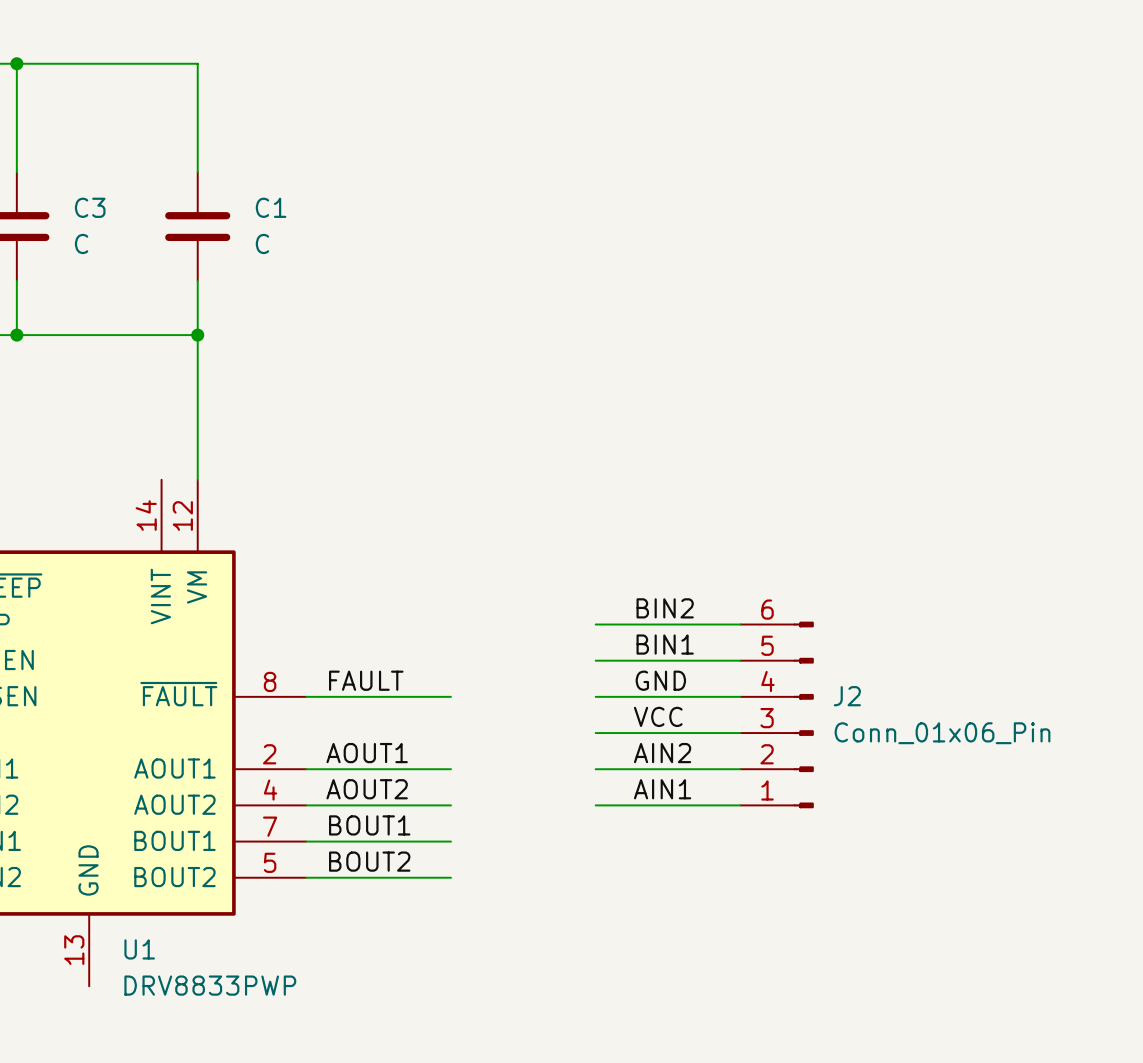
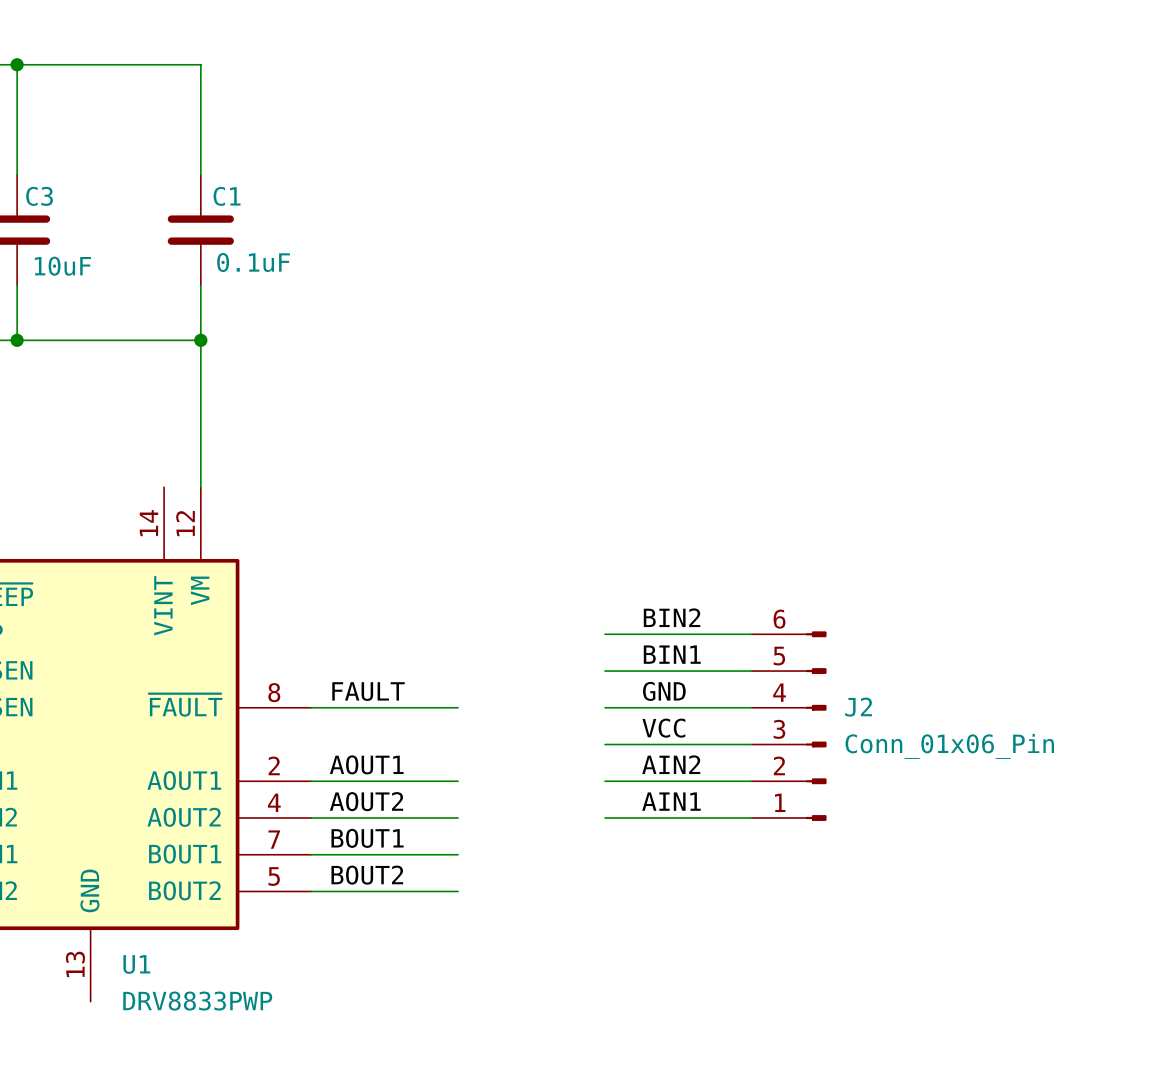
C3 name position: C3 (90, 207) -> C3 (39, 196)
C1 name position: C1 (271, 207) -> C1 (227, 196)
C3 value: C (81, 243) -> 10uF (62, 266)
C1 value: C (262, 243) -> 0.1uF (253, 262)

